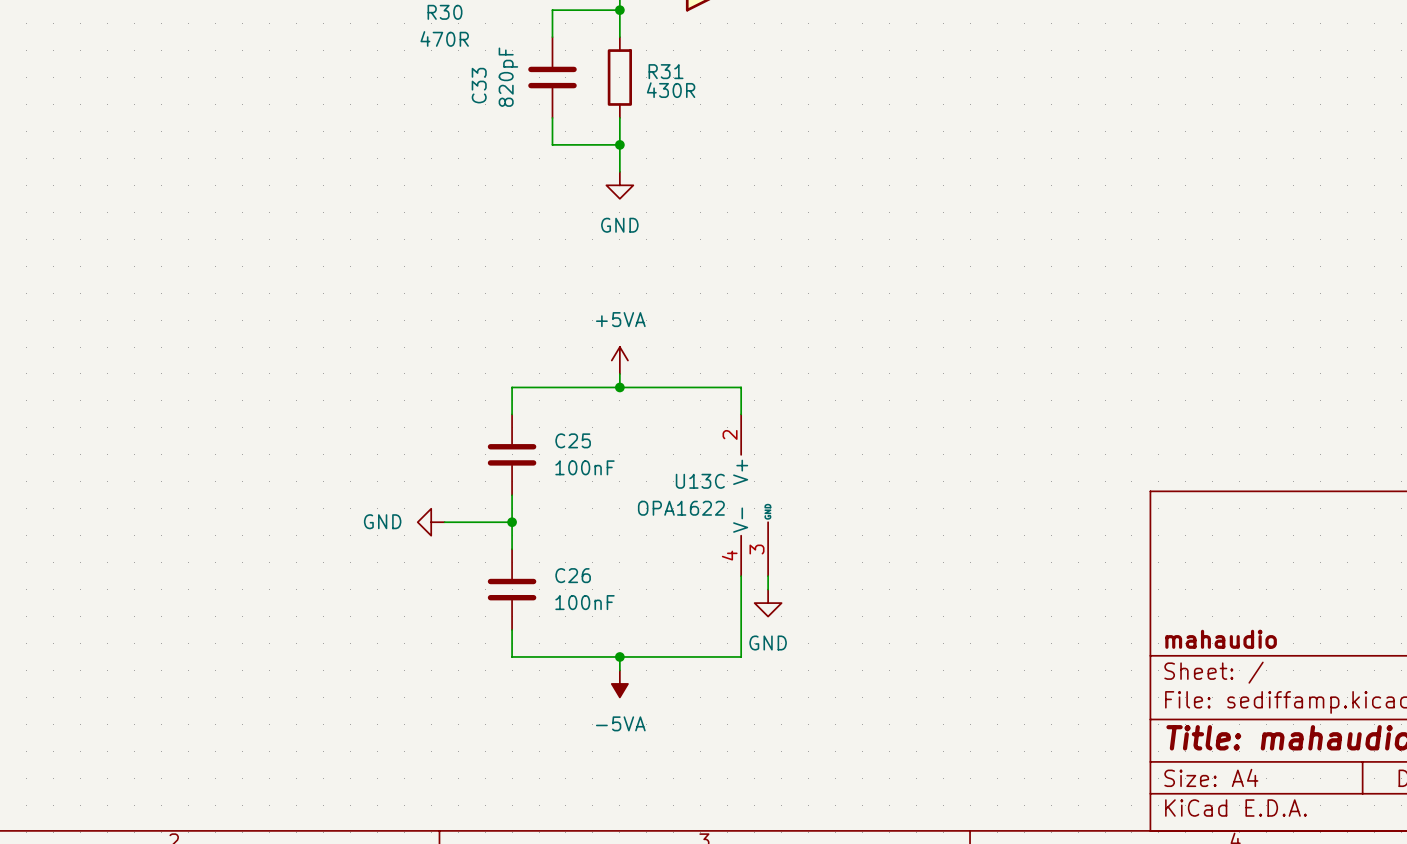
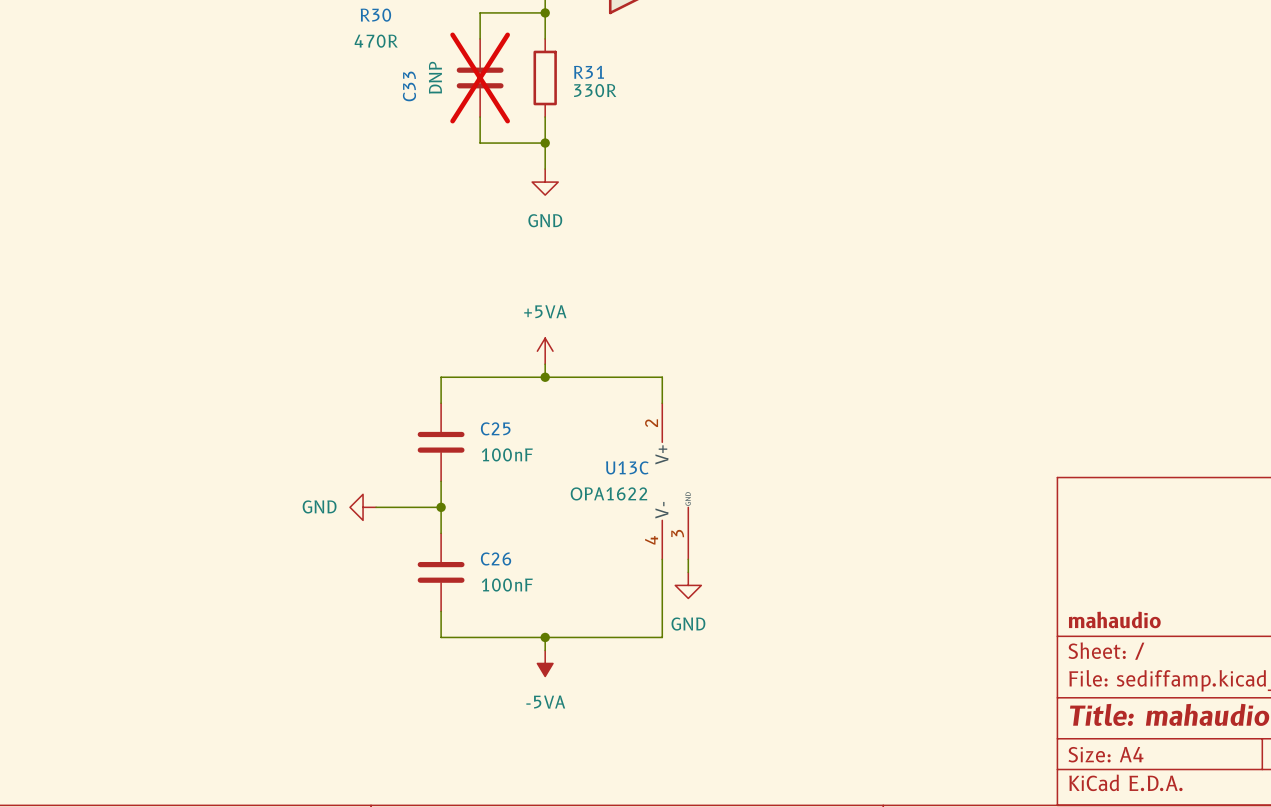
C33 value: 820pF (508, 77) -> DNP (435, 77)
C33 do-not-place cross: none -> (480, 77)
R31 value: 430R (671, 90) -> 330R (595, 90)

